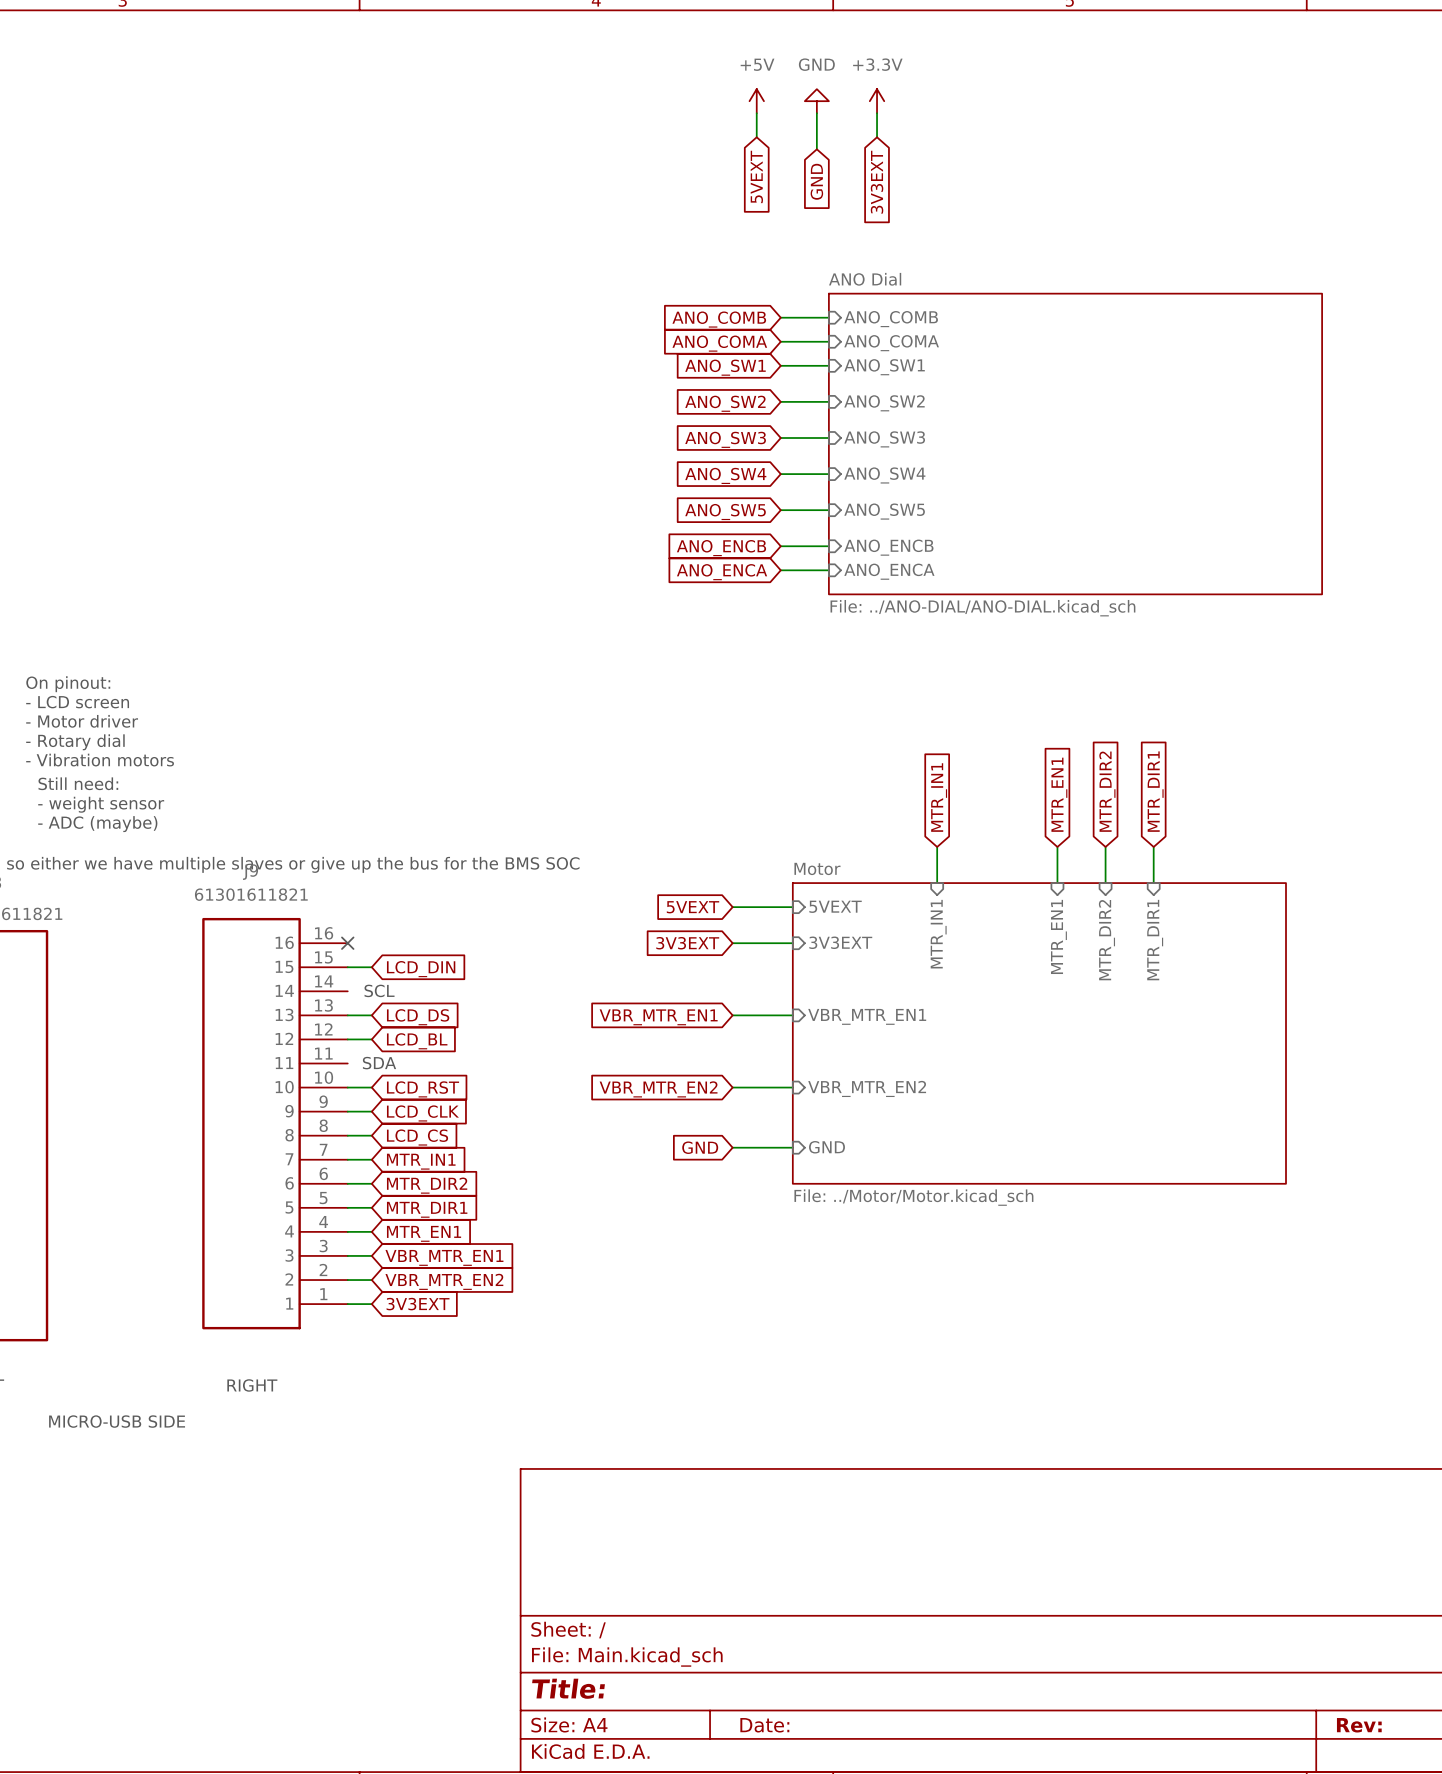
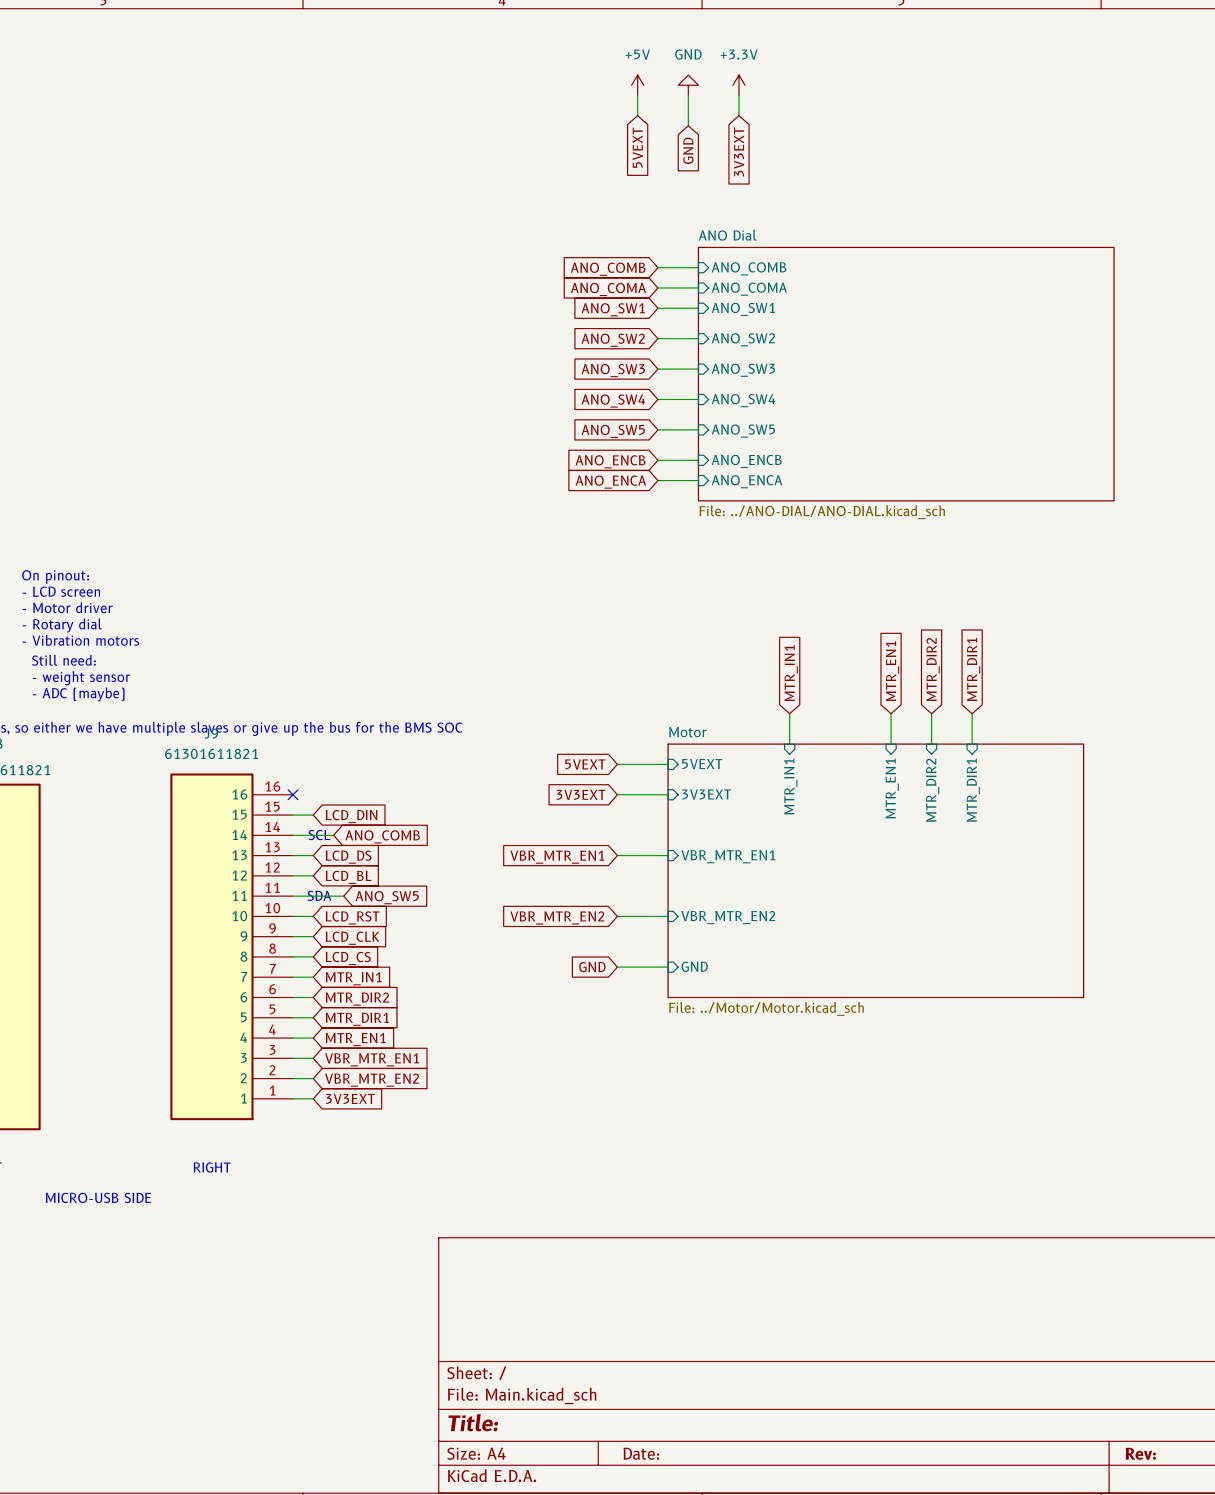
wire: none -> (293, 835) (333, 835)
global label: none -> ANO_COMB (382, 836)
wire: none -> (293, 896) (343, 896)
global label: none -> ANO_SW5 (387, 897)

